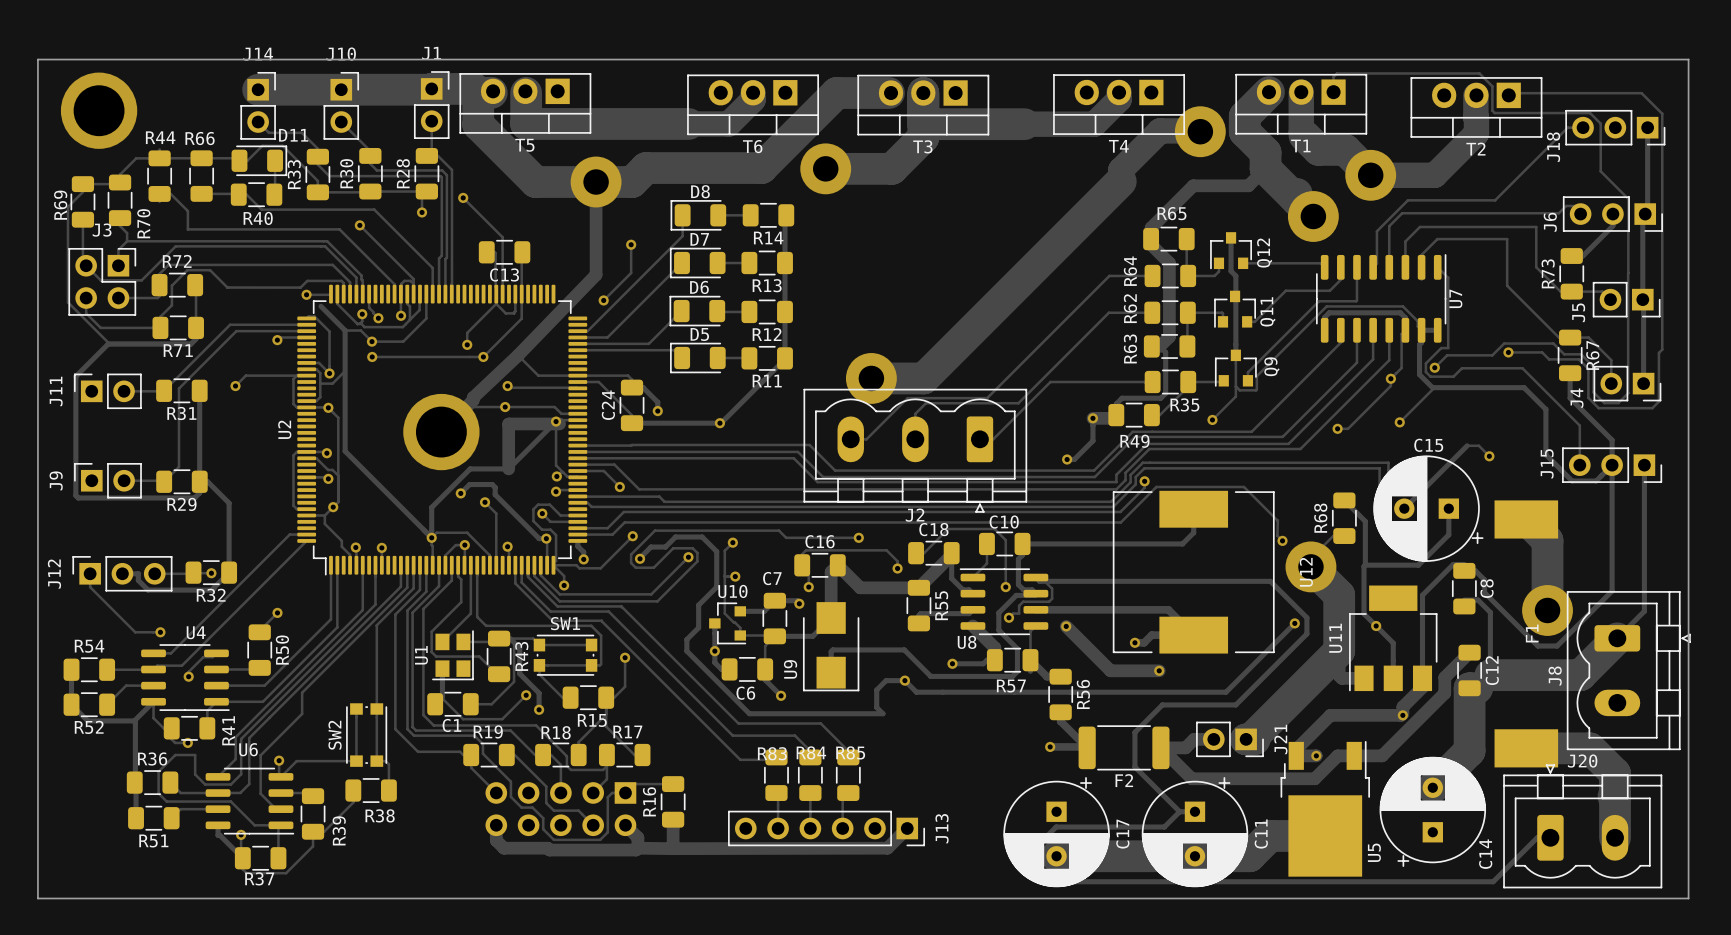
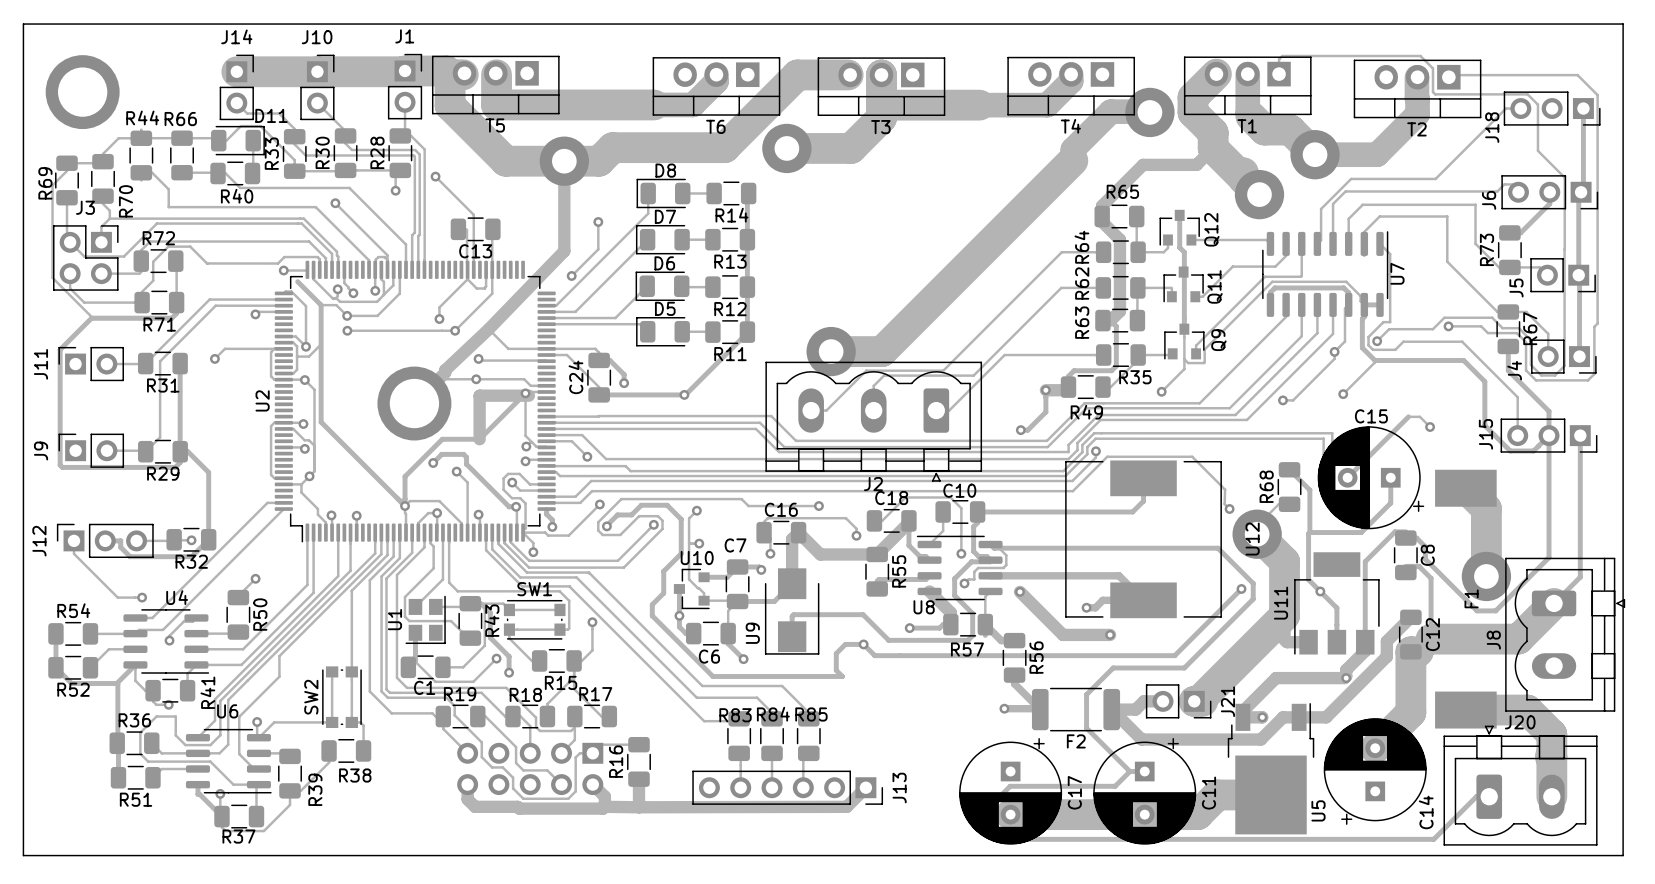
board edge: (37, 59) (1688, 59) -> (23, 42) (23, 24) (1623, 24) (1623, 42)

